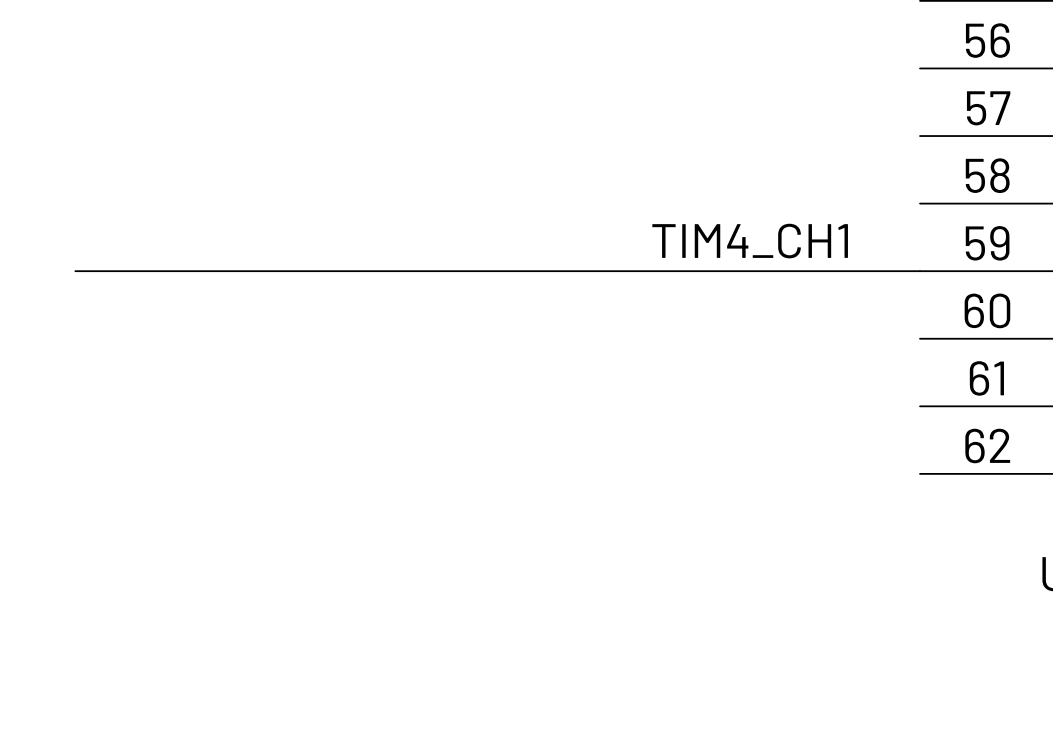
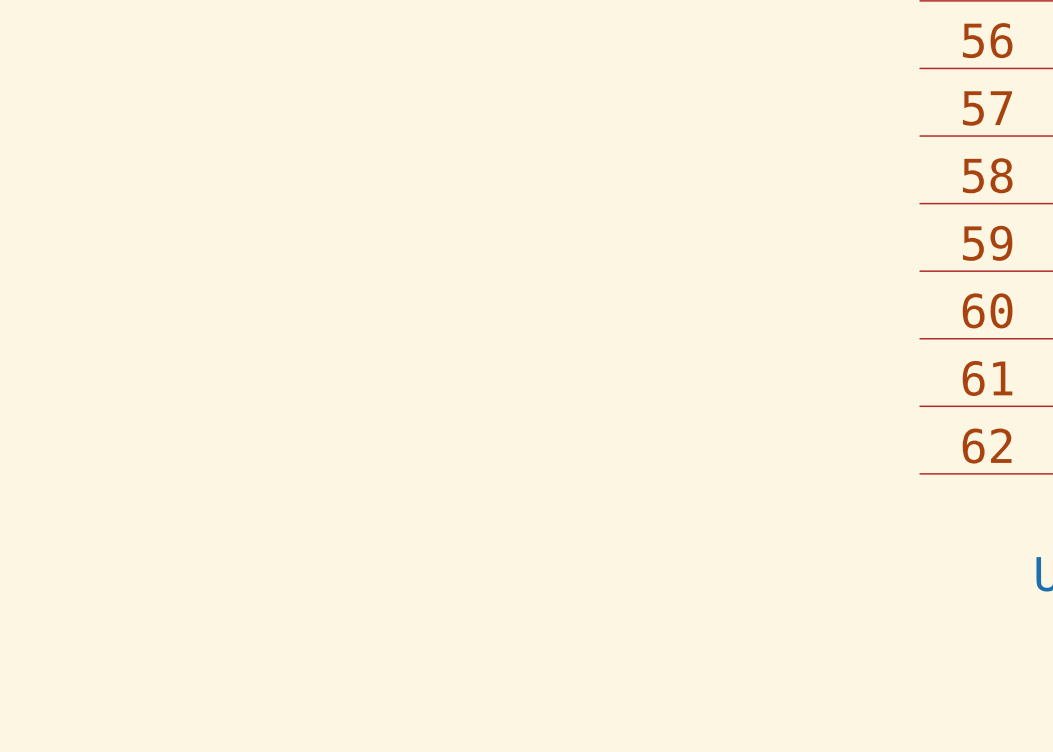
label: TIM4_CH1 (750, 241) -> none
wire: (75, 271) (920, 271) -> none

